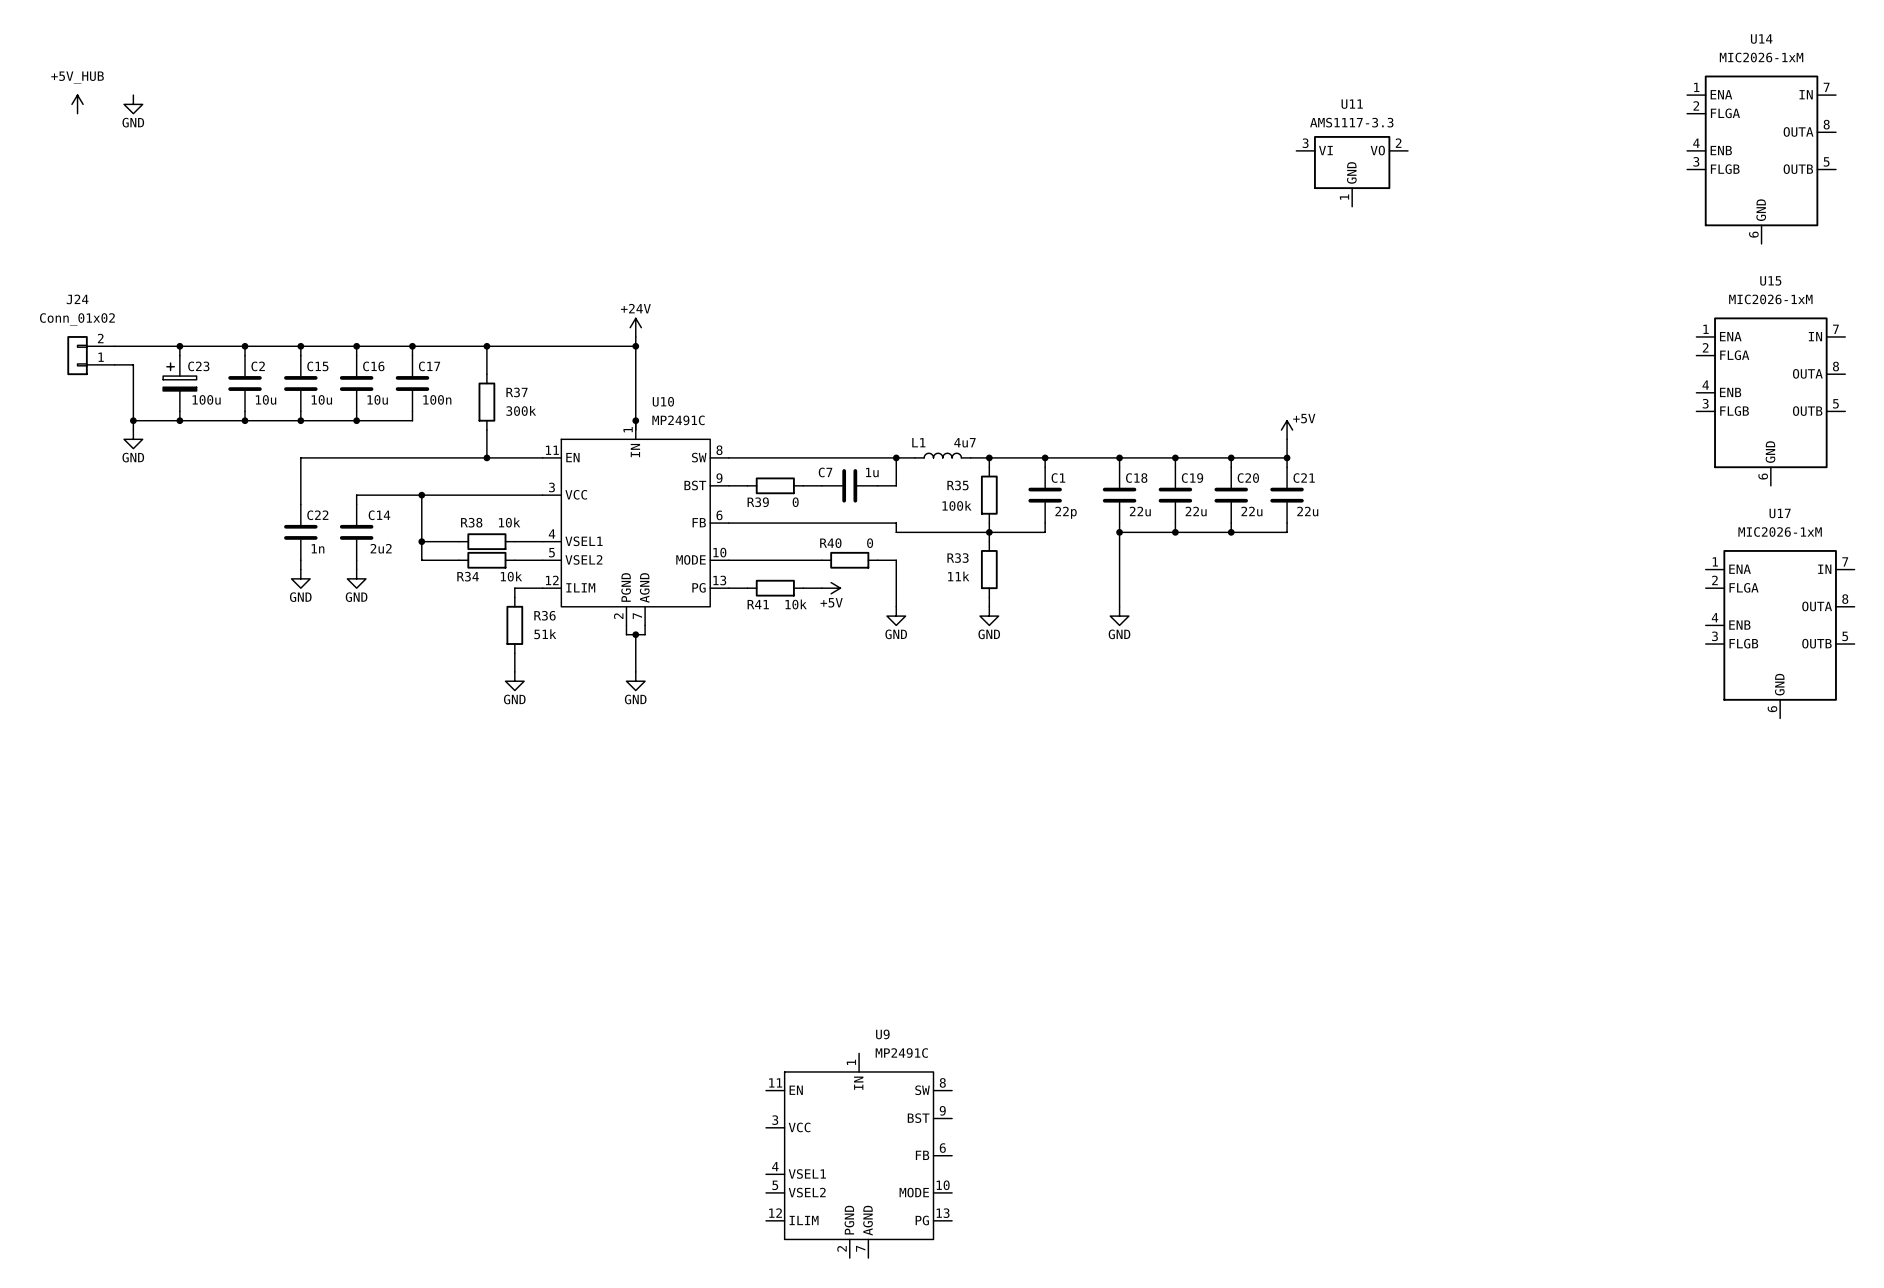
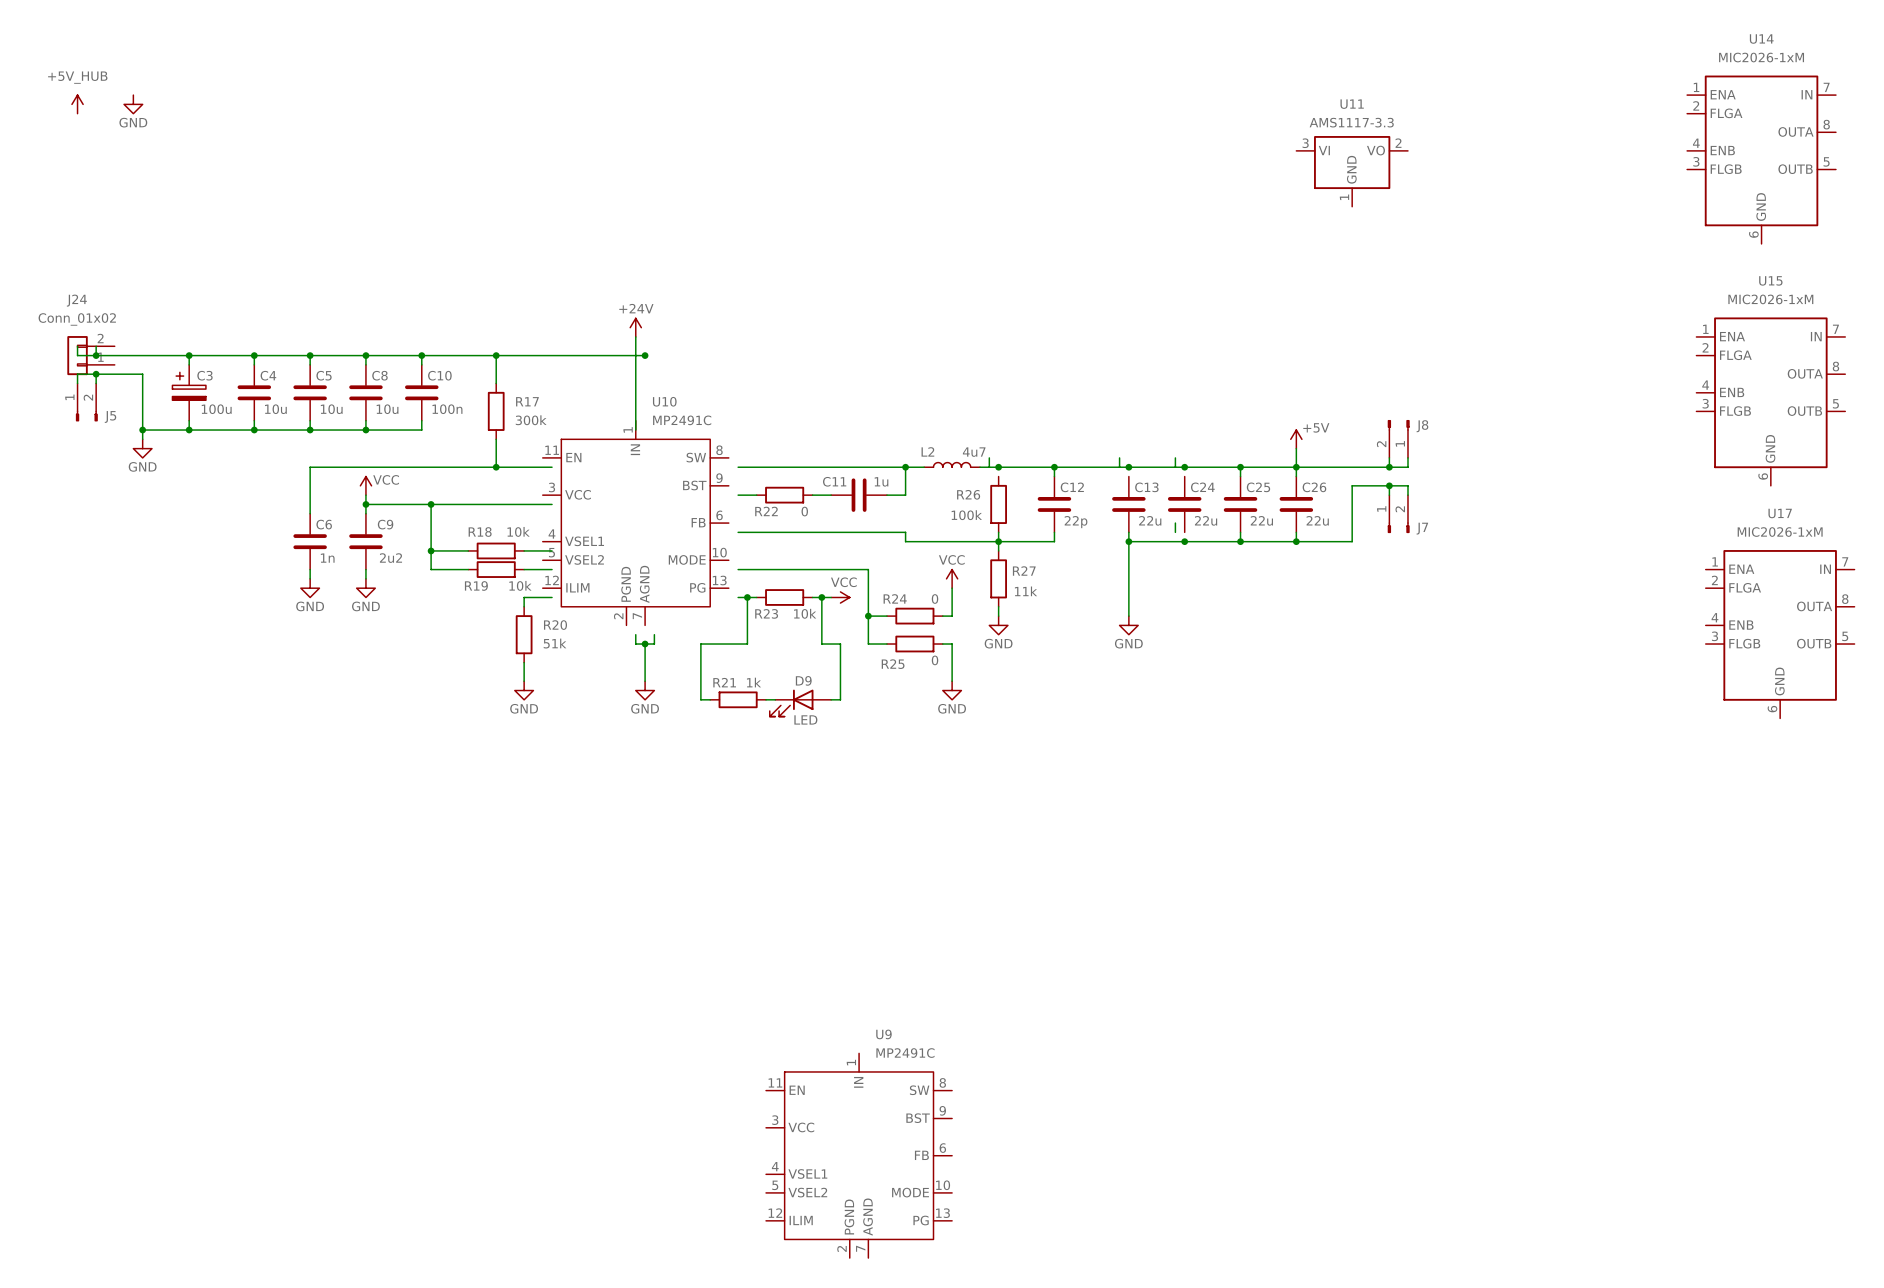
wire: none -> (77, 346) (77, 355) (645, 355)
wire: none -> (96, 346) (96, 355)
wire: (114, 346) (635, 346) -> none
wire: (179, 346) (179, 355) -> (189, 355) (189, 364)
junction position: (179, 346) -> (189, 355)
wire: (245, 346) (245, 355) -> (254, 355) (254, 364)
junction position: (245, 346) -> (254, 355)
wire: (300, 346) (300, 355) -> (310, 355) (310, 364)
junction position: (300, 346) -> (310, 355)
wire: (356, 346) (356, 355) -> (365, 355) (365, 364)
junction position: (356, 346) -> (365, 355)
wire: (412, 346) (412, 355) -> (421, 355) (421, 364)
junction position: (412, 346) -> (421, 355)
wire: (486, 346) (486, 374) -> (496, 355) (496, 383)
junction position: (486, 346) -> (496, 355)
junction position: (635, 346) -> (645, 355)
junction: none -> (96, 355)
wire: (114, 364) (133, 364) (133, 430) -> none
wire: none -> (96, 374) (96, 383)
junction: none -> (96, 374)
wire: none -> (77, 383) (77, 374) (142, 374) (142, 439)
C23: 100u (179, 383) -> none
C2: 10u (245, 383) -> none
C15: 10u (300, 383) -> none
C16: 10u (356, 383) -> none
C17: 100n (412, 383) -> none
C3: none -> 100u (189, 392)
C4: none -> 10u (254, 392)
C5: none -> 10u (310, 392)
C8: none -> 10u (365, 392)
C10: none -> 100n (421, 392)
J5: none -> (86, 402)
R37: 300k (486, 402) -> none
wire: (179, 411) (179, 420) -> (189, 420) (189, 430)
wire: (245, 411) (245, 420) -> (254, 420) (254, 430)
wire: (300, 411) (300, 420) -> (310, 420) (310, 430)
wire: (356, 411) (356, 420) -> (365, 420) (365, 430)
wire: (412, 411) (412, 420) (133, 420) -> (421, 420) (421, 430) (142, 430)
R17: none -> 300k (496, 411)
junction position: (133, 420) -> (142, 430)
junction position: (179, 420) -> (189, 430)
junction position: (245, 420) -> (254, 430)
junction position: (300, 420) -> (310, 430)
junction position: (356, 420) -> (365, 430)
junction: (635, 420) -> none
wire: (486, 430) (486, 457) -> (496, 439) (496, 467)
power symbol position: +5V (1287, 430) -> +5V (1296, 439)
power symbol position: GND (133, 439) -> GND (142, 448)
wire: (1287, 439) (1287, 467) -> (1296, 448) (1296, 476)
J8: none -> (1398, 439)
L1: 4u7 (942, 455) -> none
junction position: (486, 457) -> (496, 467)
wire: (542, 457) (300, 457) (300, 504) -> (552, 467) (310, 467) (310, 513)
wire: (728, 457) (914, 457) -> (738, 467) (924, 467)
wire: (896, 457) (896, 485) (877, 485) -> (905, 467) (905, 495) (886, 495)
junction position: (896, 457) -> (905, 467)
wire: (970, 457) (1287, 457) -> none
junction position: (989, 457) -> (998, 467)
wire: (1045, 457) (1045, 467) -> (1054, 467) (1054, 476)
junction position: (1045, 457) -> (1054, 467)
junction position: (1119, 457) -> (1128, 467)
junction position: (1175, 457) -> (1184, 467)
wire: (1231, 457) (1231, 467) -> (1240, 467) (1240, 476)
junction position: (1231, 457) -> (1240, 467)
junction position: (1287, 457) -> (1296, 467)
wire: none -> (1389, 457) (1389, 467)
wire: none -> (1407, 457) (1407, 467) (980, 467)
L2: none -> 4u7 (952, 464)
junction: none -> (1389, 467)
power symbol: none -> VCC (365, 485)
wire: (728, 485) (747, 485) -> (738, 495) (756, 495)
R39: 0 (775, 485) -> none
wire: (803, 485) (821, 485) -> (812, 495) (831, 495)
C7: 1u (849, 485) -> none
wire: none -> (1389, 485) (1389, 495)
junction: none -> (1389, 485)
wire: none -> (365, 495) (365, 513)
wire: (421, 495) (421, 560) (459, 560) -> (431, 504) (431, 569) (468, 569)
junction position: (421, 495) -> (431, 504)
wire: (542, 495) (356, 495) (356, 504) -> none
R22: none -> 0 (784, 495)
C11: none -> 1u (859, 495)
R35: 100k (989, 495) -> none
C1: 22p (1045, 495) -> none
C18: 22u (1119, 495) -> none
C19: 22u (1175, 495) -> none
C20: 22u (1231, 495) -> none
C21: 22u (1287, 495) -> none
wire: none -> (1407, 495) (1407, 485) (1352, 485) (1352, 541) (1128, 541)
wire: none -> (365, 504) (552, 504)
junction: none -> (365, 504)
R26: none -> 100k (998, 504)
C12: none -> 22p (1054, 504)
C13: none -> 22u (1128, 504)
C24: none -> 22u (1184, 504)
C25: none -> 22u (1240, 504)
C26: none -> 22u (1296, 504)
J7: none -> (1398, 514)
wire: (728, 523) (896, 523) (896, 532) -> (738, 532) (896, 532)
wire: (989, 523) (989, 541) -> (998, 532) (998, 550)
wire: (1045, 523) (1045, 532) (905, 532) -> (1054, 532) (1054, 541) (905, 541) (905, 532)
wire: (1119, 523) (1119, 606) -> (1128, 532) (1128, 616)
wire: (1231, 523) (1231, 532) -> (1240, 532) (1240, 541)
wire: (1287, 523) (1287, 532) (1119, 532) -> none
C22: 1n (300, 532) -> none
C14: 2u2 (356, 532) -> none
junction position: (989, 532) -> (998, 541)
junction position: (1119, 532) -> (1128, 541)
junction position: (1175, 532) -> (1184, 541)
junction position: (1231, 532) -> (1240, 541)
wire: none -> (1296, 532) (1296, 541)
C6: none -> 1n (310, 541)
C9: none -> 2u2 (365, 541)
wire: (421, 541) (459, 541) -> (431, 550) (468, 550)
junction position: (421, 541) -> (431, 550)
R38: 10k (486, 541) -> none
wire: (514, 541) (542, 541) -> (524, 550) (552, 550)
junction: none -> (1296, 541)
R18: none -> 10k (496, 550)
wire: (300, 560) (300, 569) -> (310, 569) (310, 578)
wire: (356, 560) (356, 569) -> (365, 569) (365, 578)
R34: 10k (486, 560) -> none
wire: (514, 560) (542, 560) -> (524, 569) (552, 569)
wire: (728, 560) (821, 560) -> none
R40: 0 (849, 560) -> none
wire: (877, 560) (896, 560) (896, 606) -> none
R19: none -> 10k (496, 569)
wire: none -> (738, 569) (868, 569) (868, 644) (886, 644)
R33: 11k (989, 569) -> none
power symbol position: GND (300, 578) -> GND (310, 588)
power symbol position: GND (356, 578) -> GND (365, 588)
power symbol: none -> VCC (952, 578)
R27: none -> 11k (998, 578)
wire: (542, 588) (514, 588) (514, 597) -> (552, 597) (524, 597) (524, 606)
wire: (728, 588) (747, 588) -> (738, 597) (756, 597)
R41: 10k (775, 588) -> none
wire: (803, 588) (821, 588) -> (812, 597) (831, 597)
power symbol: +5V (831, 588) -> none
wire: none -> (952, 588) (952, 616) (942, 616)
wire: none -> (747, 597) (747, 644) (700, 644) (700, 699) (710, 699)
junction: none -> (747, 597)
R23: none -> 10k (784, 597)
wire: none -> (821, 597) (821, 644) (840, 644) (840, 699) (831, 699)
junction: none -> (821, 597)
power symbol: none -> VCC (840, 597)
wire: (989, 597) (989, 606) -> (998, 606) (998, 616)
wire: none -> (868, 616) (886, 616)
junction: none -> (868, 616)
power symbol: GND (896, 616) -> none
R24: none -> 0 (914, 616)
power symbol position: GND (989, 616) -> GND (998, 625)
power symbol position: GND (1119, 616) -> GND (1128, 625)
R36: 51k (514, 625) -> none
wire: (626, 625) (626, 634) (645, 634) (645, 625) -> none
R20: none -> 51k (524, 634)
junction position: (635, 634) -> (645, 644)
wire: (635, 644) (635, 671) -> (635, 644) (654, 644) (654, 634)
wire: none -> (645, 644) (645, 681)
R25: none -> 0 (914, 644)
wire: none -> (942, 644) (952, 644) (952, 681)
wire: (514, 653) (514, 671) -> (524, 662) (524, 681)
power symbol position: GND (514, 681) -> GND (524, 690)
power symbol position: GND (635, 681) -> GND (645, 690)
power symbol: none -> GND (952, 690)
R21: none -> 1k (738, 699)
wire: none -> (766, 699) (775, 699)
D9: none -> LED (800, 703)

